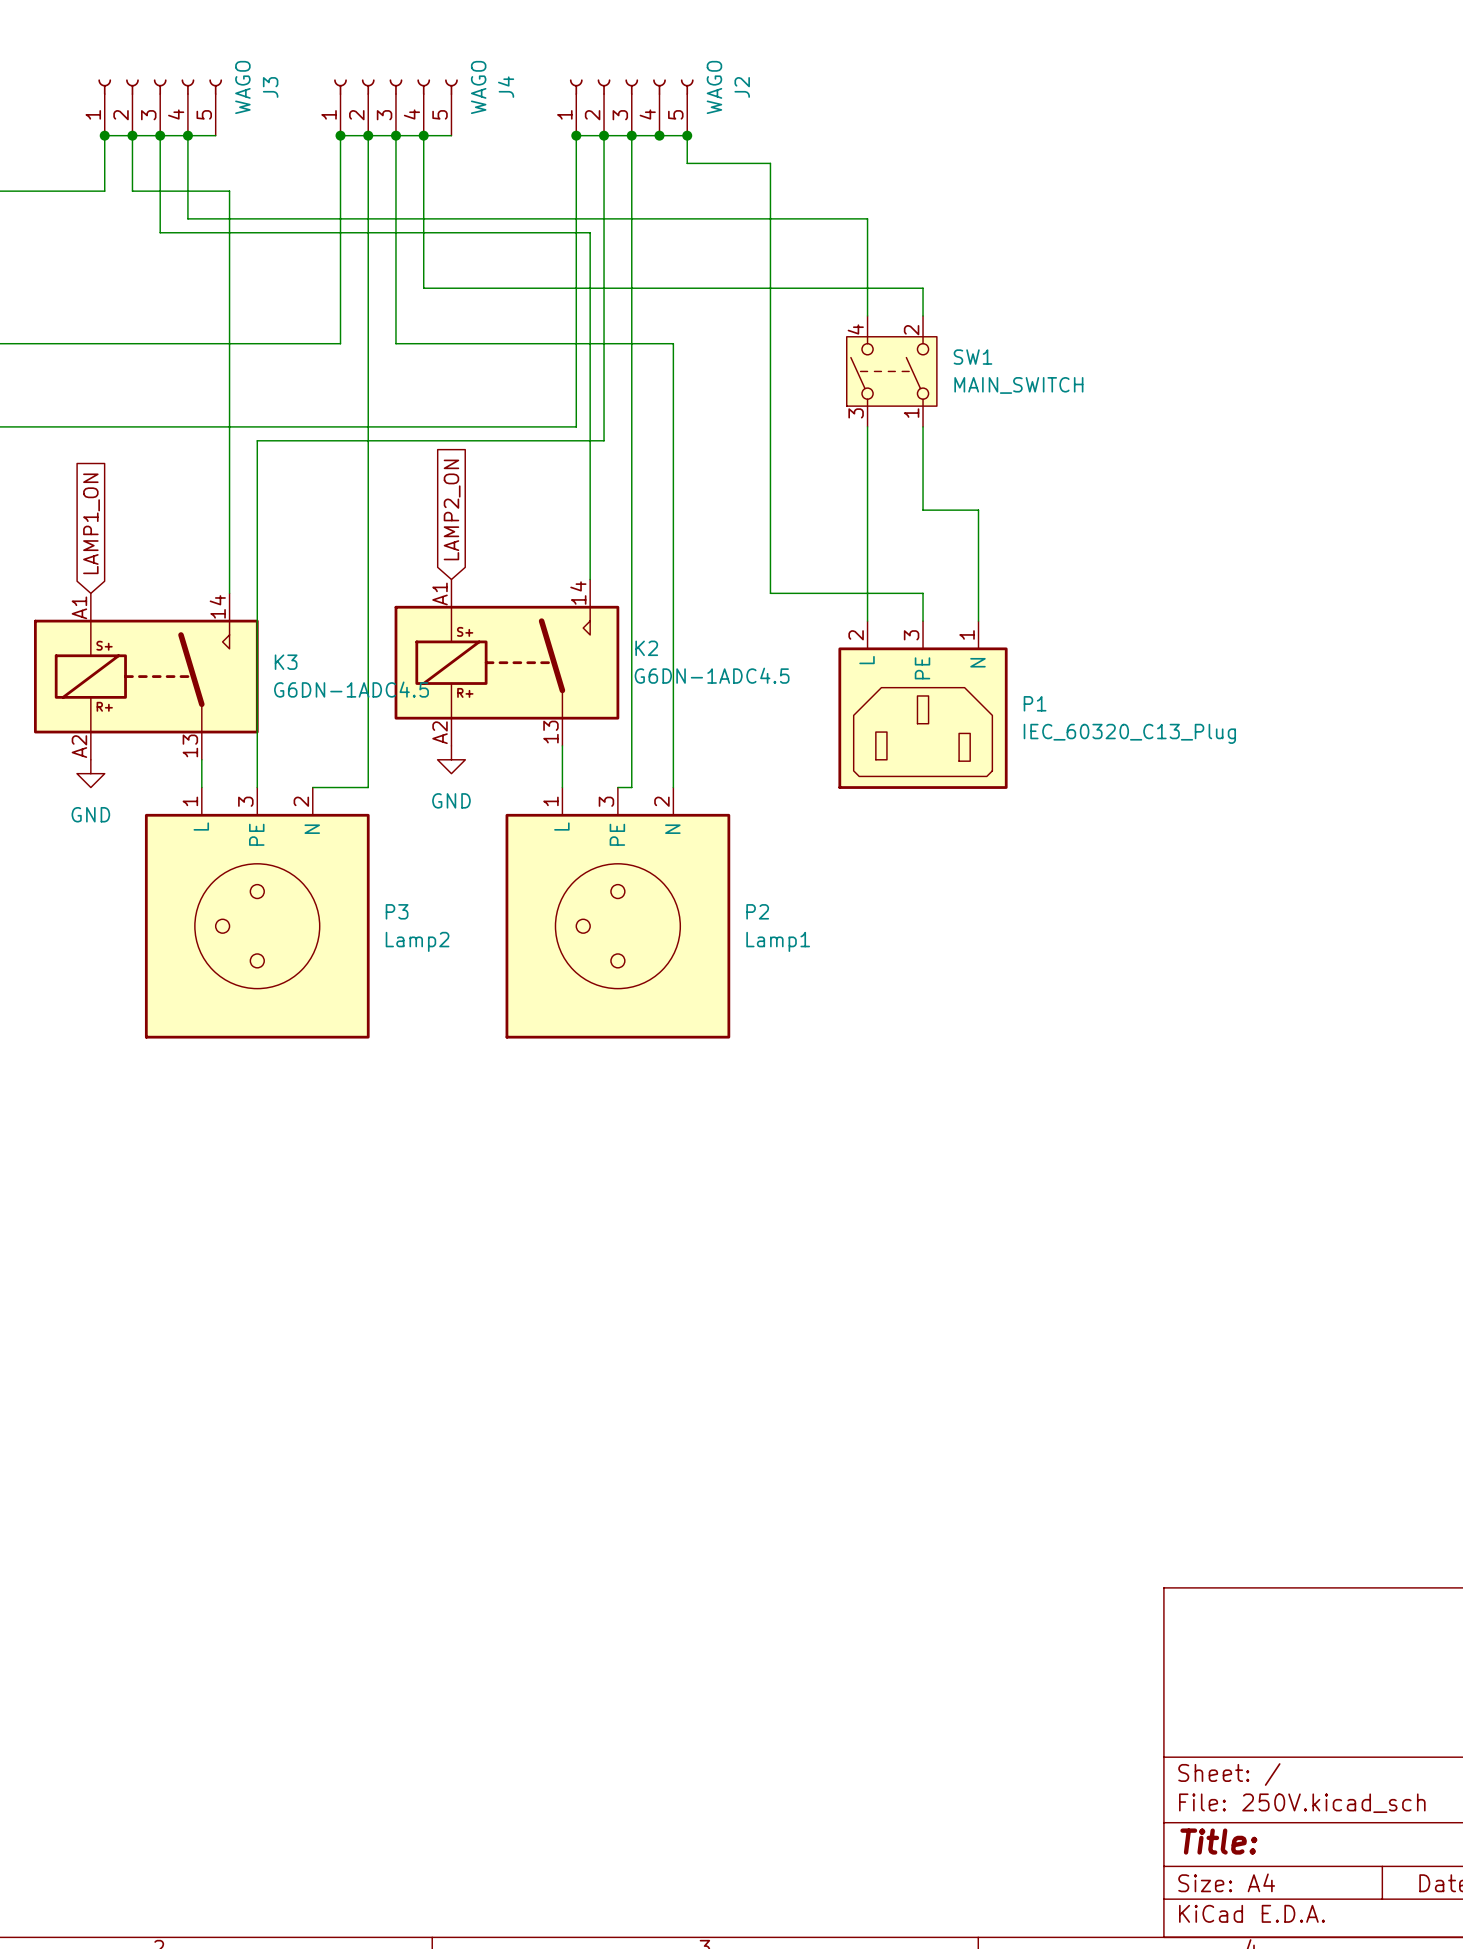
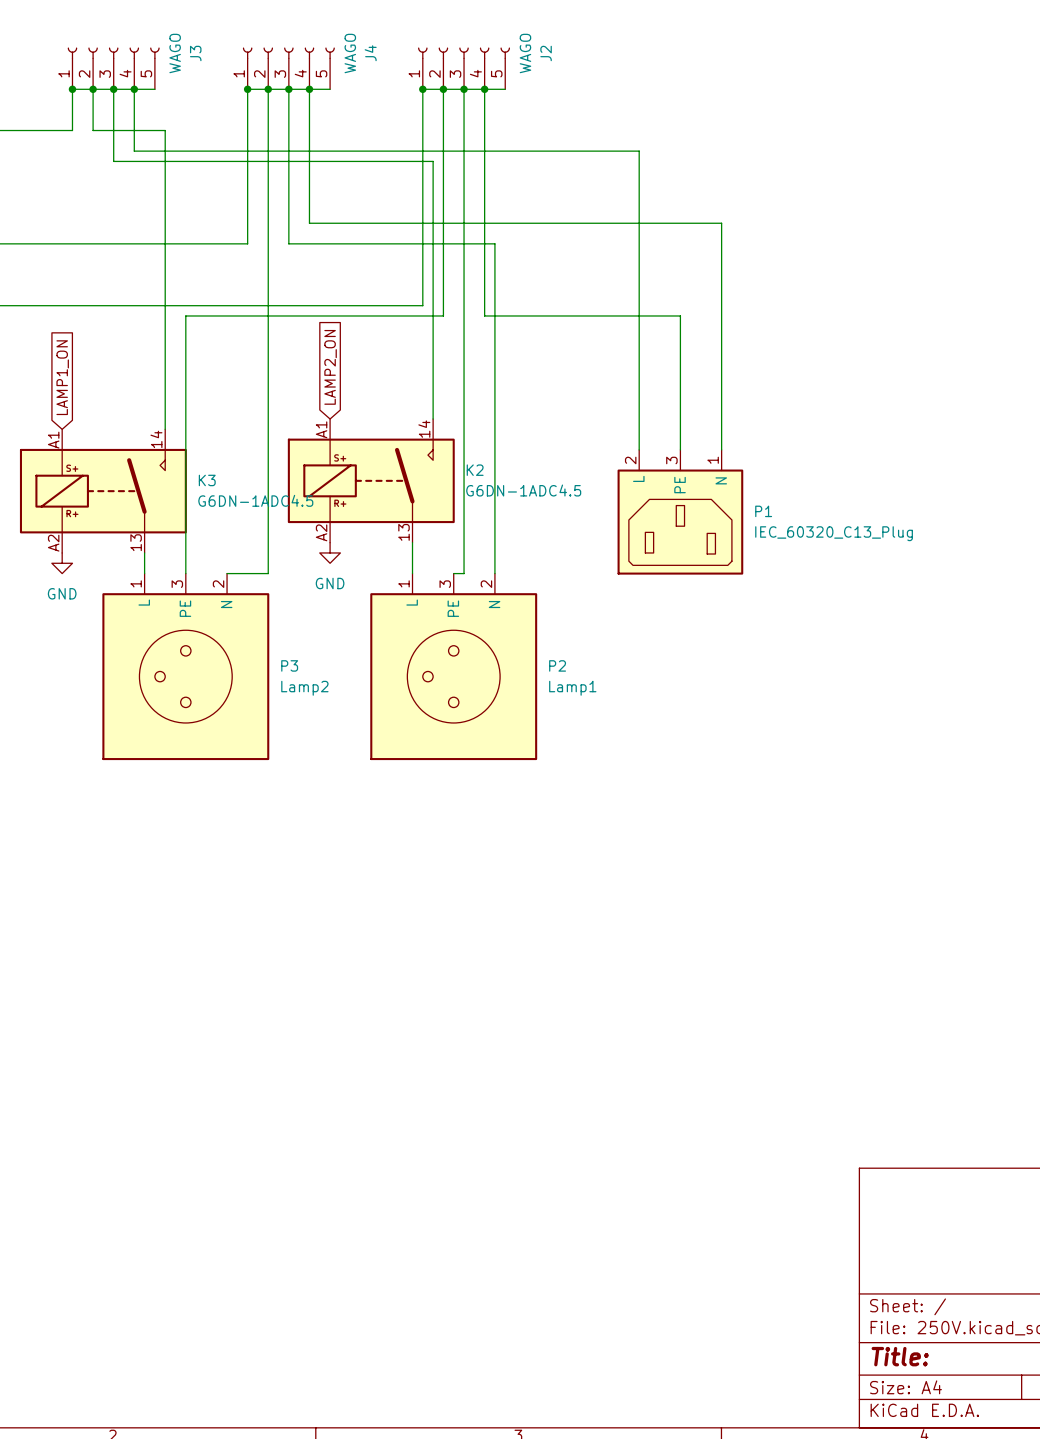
wire: (687, 135) (687, 163) (770, 163) (770, 593) (923, 593) -> none
junction: (687, 135) -> none
wire: (423, 288) (923, 288) (923, 315) -> (309, 202) (309, 223) (721, 223) (721, 367)
SW1: MAIN_SWITCH (891, 371) -> none
wire: (923, 426) (923, 440) -> (484, 89) (484, 315) (680, 315)
wire: (923, 510) (978, 510) -> (680, 367) (680, 429)

